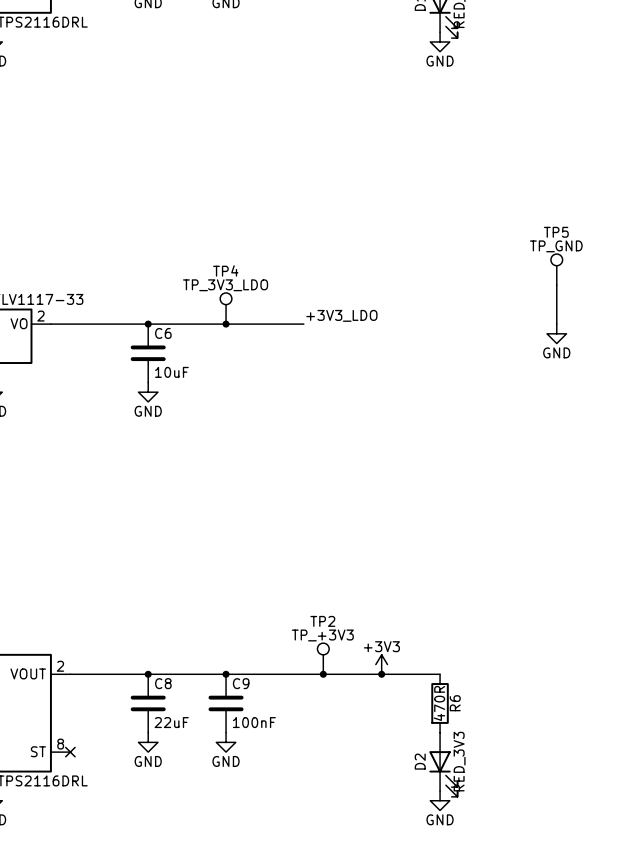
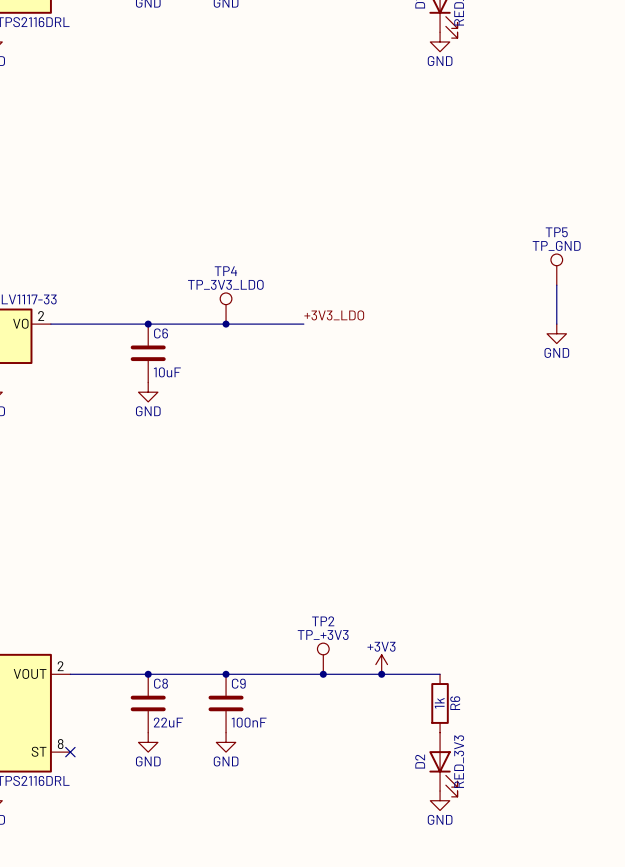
R6 value: 470R (439, 703) -> 1k (439, 703)

